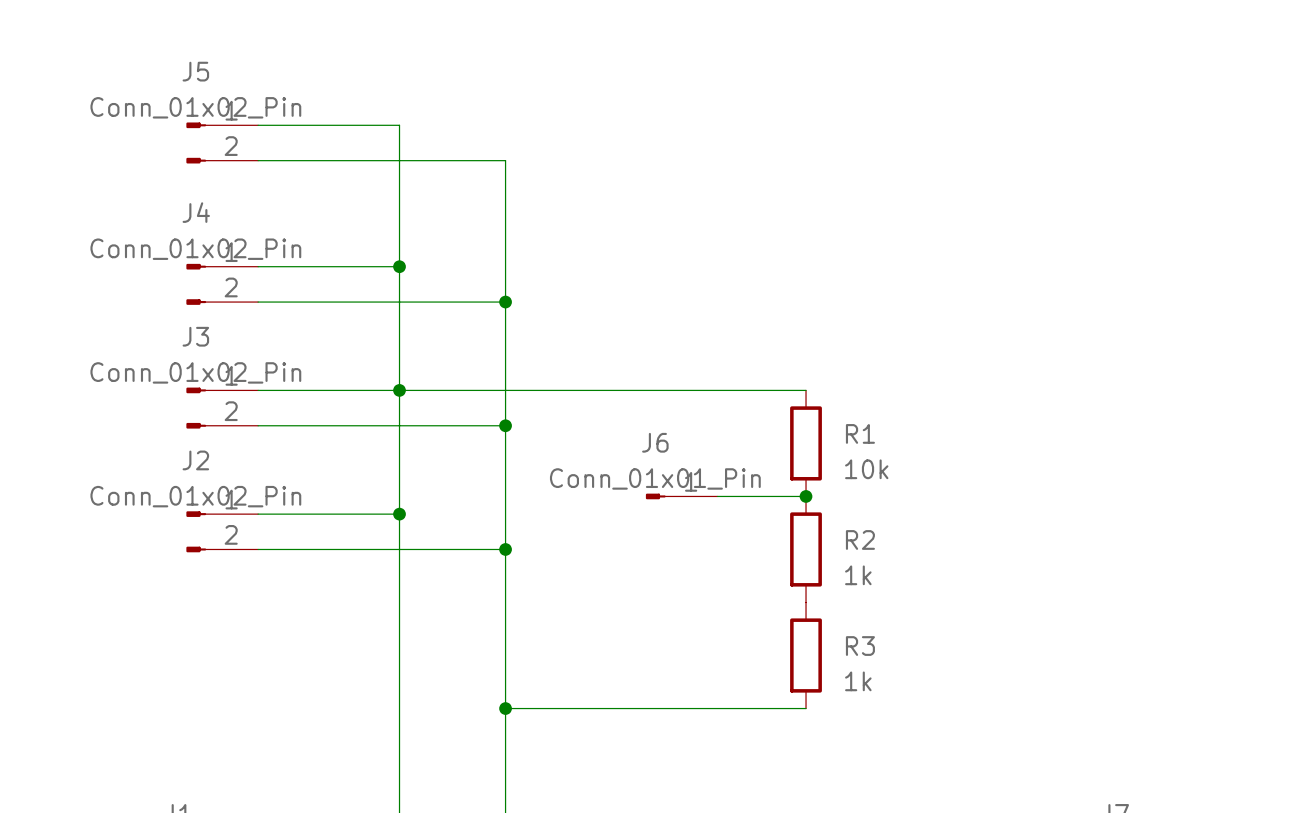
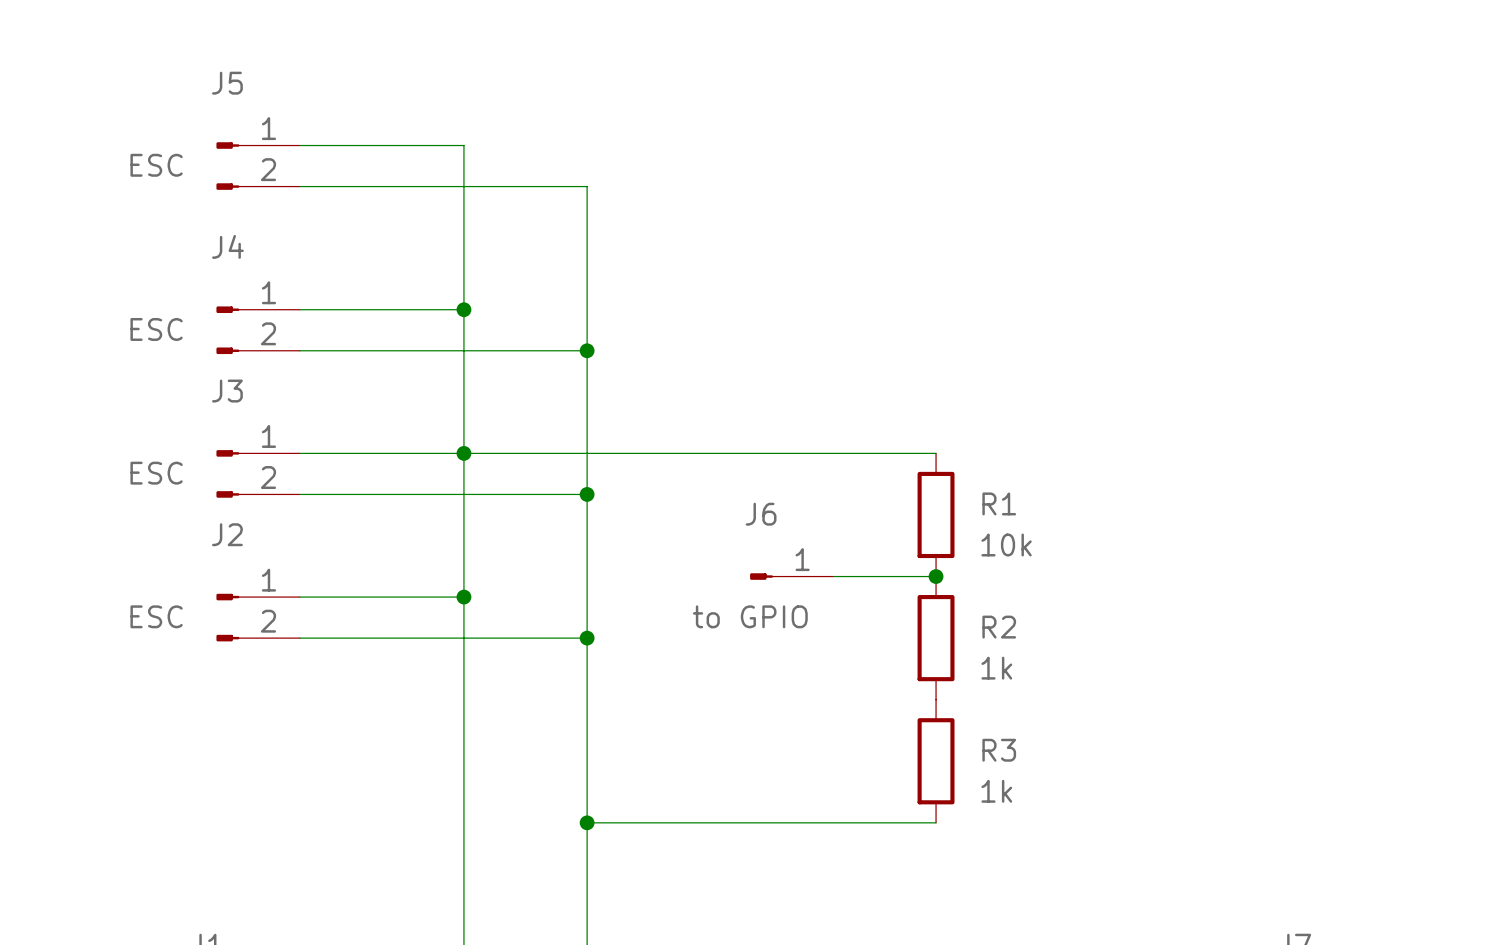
J5 value: Conn_01x02_Pin (195, 107) -> ESC (156, 165)
J4 value: Conn_01x02_Pin (195, 249) -> ESC (156, 329)
J3 value: Conn_01x02_Pin (195, 372) -> ESC (156, 473)
J6 value: Conn_01x01_Pin (655, 478) -> to GPIO (750, 616)
J2 value: Conn_01x02_Pin (195, 496) -> ESC (156, 616)

